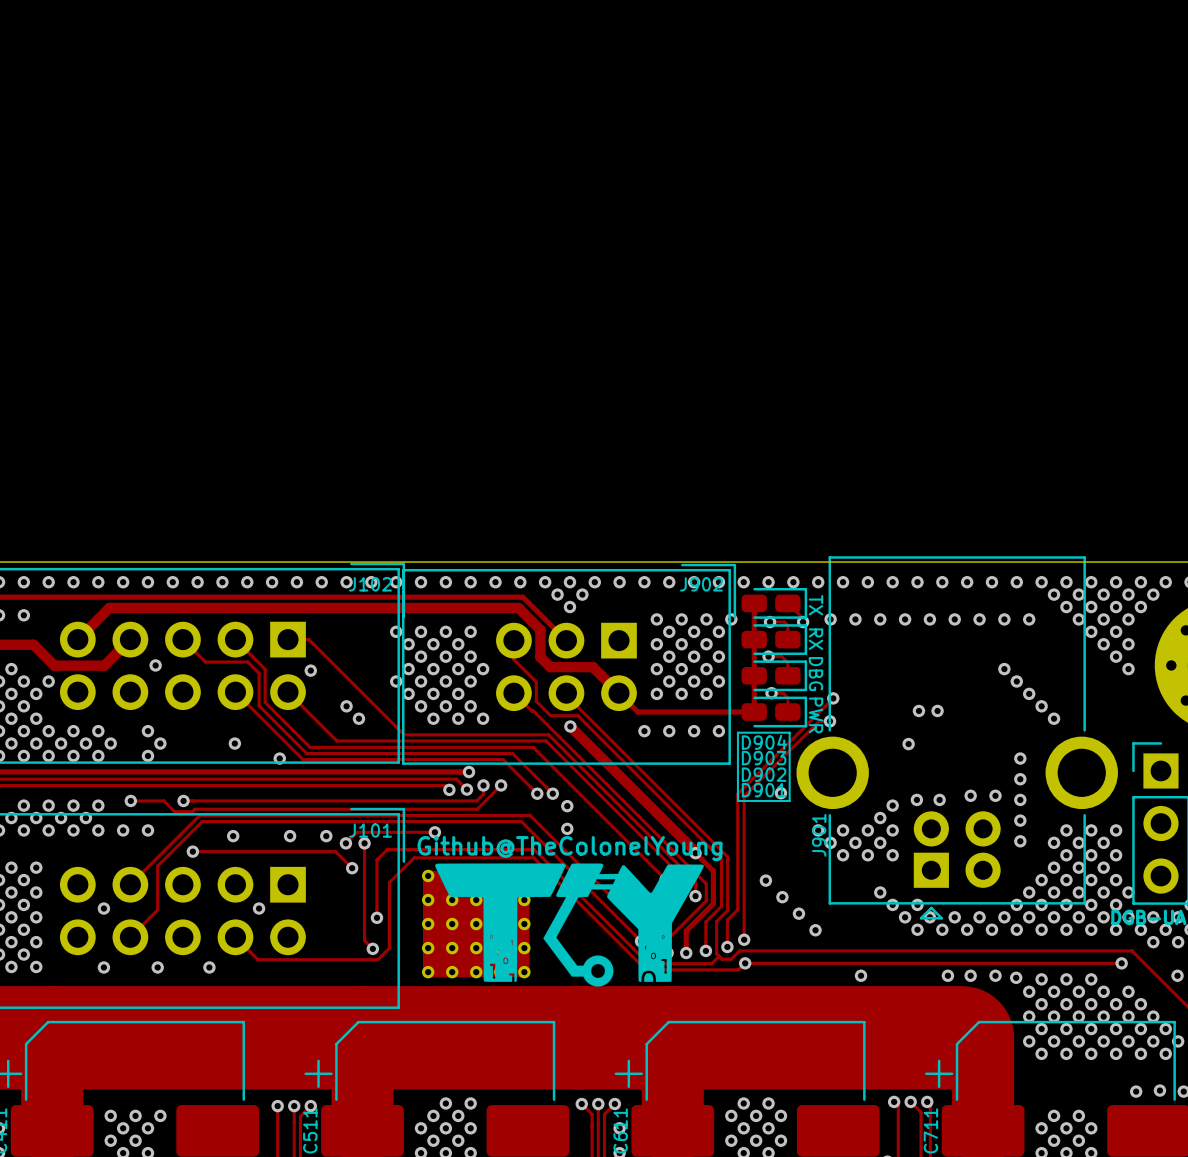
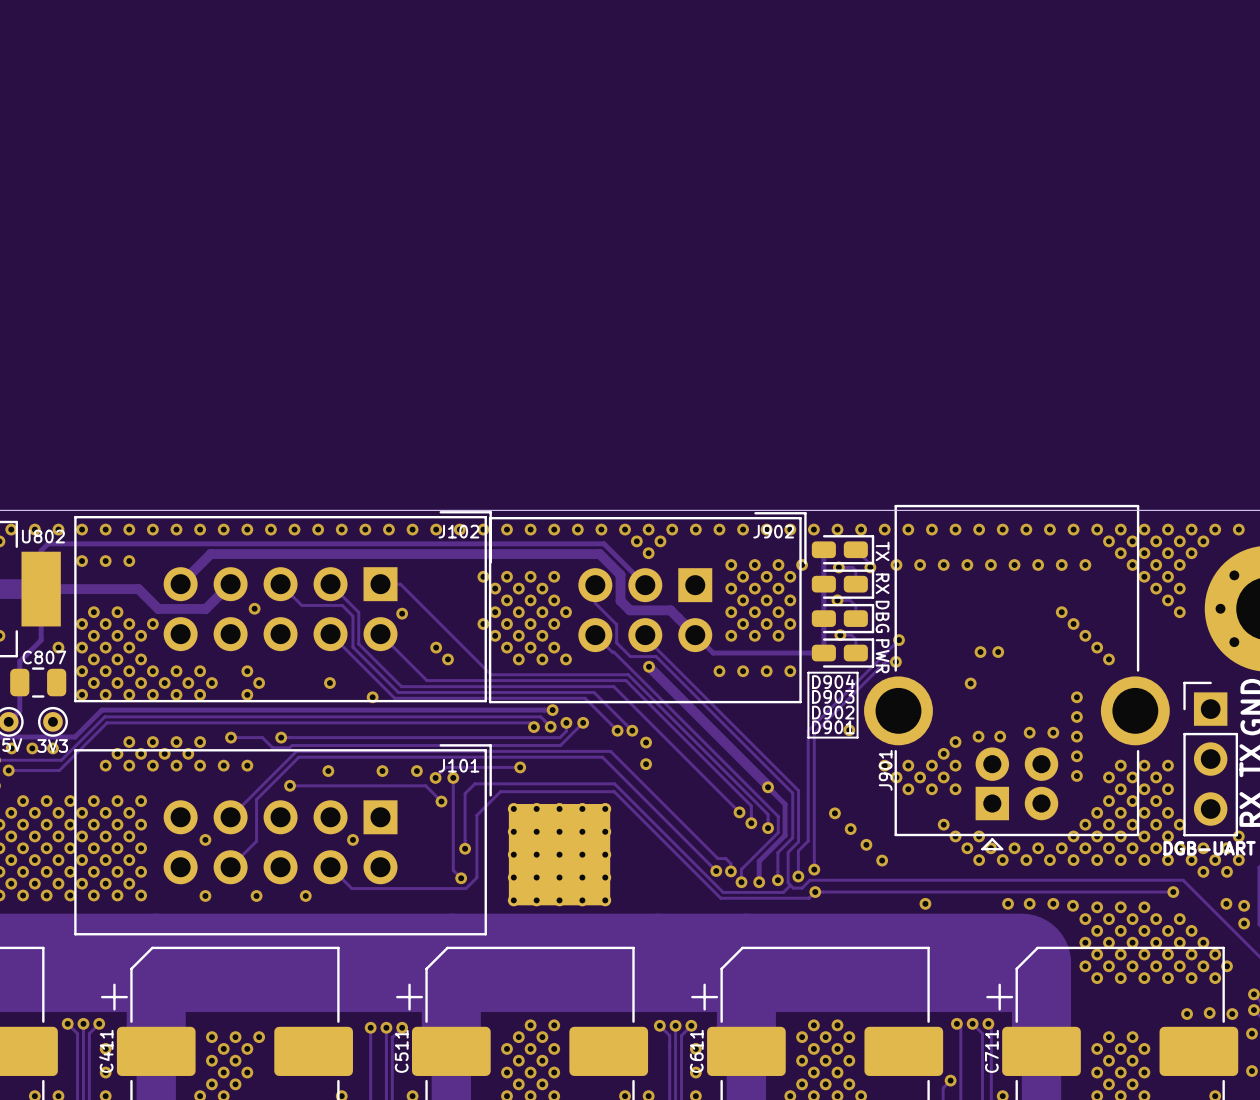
text: Github@TheColonelYoung (569, 848) -> none
drawing: [435, 863, 704, 987] -> none

